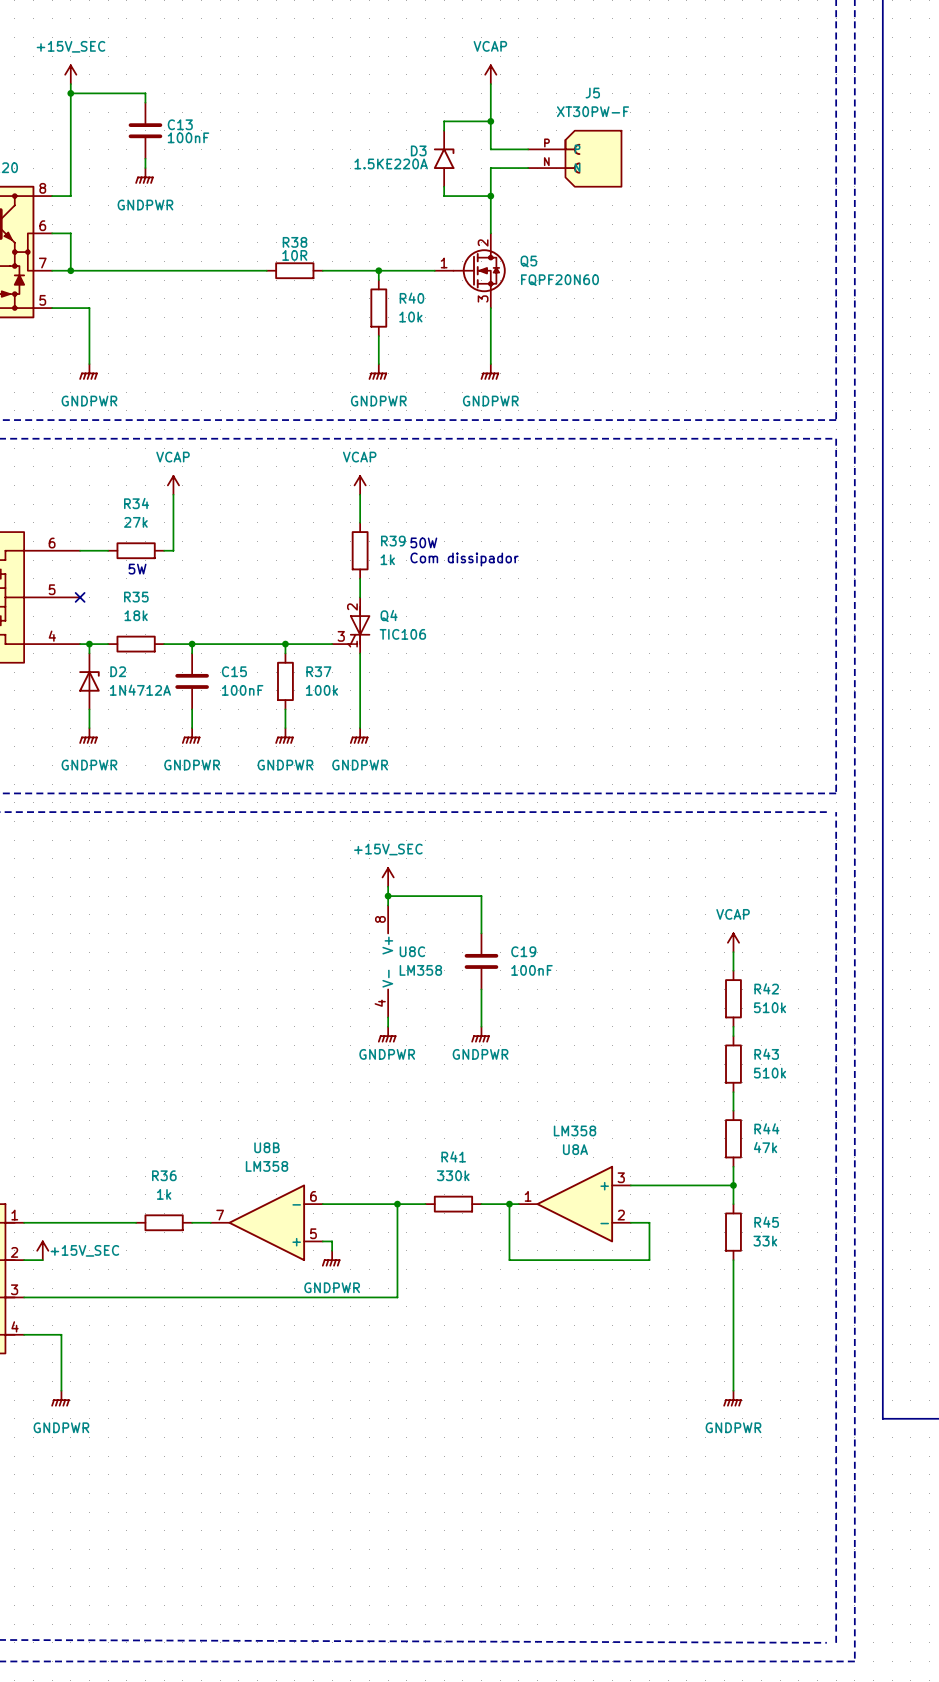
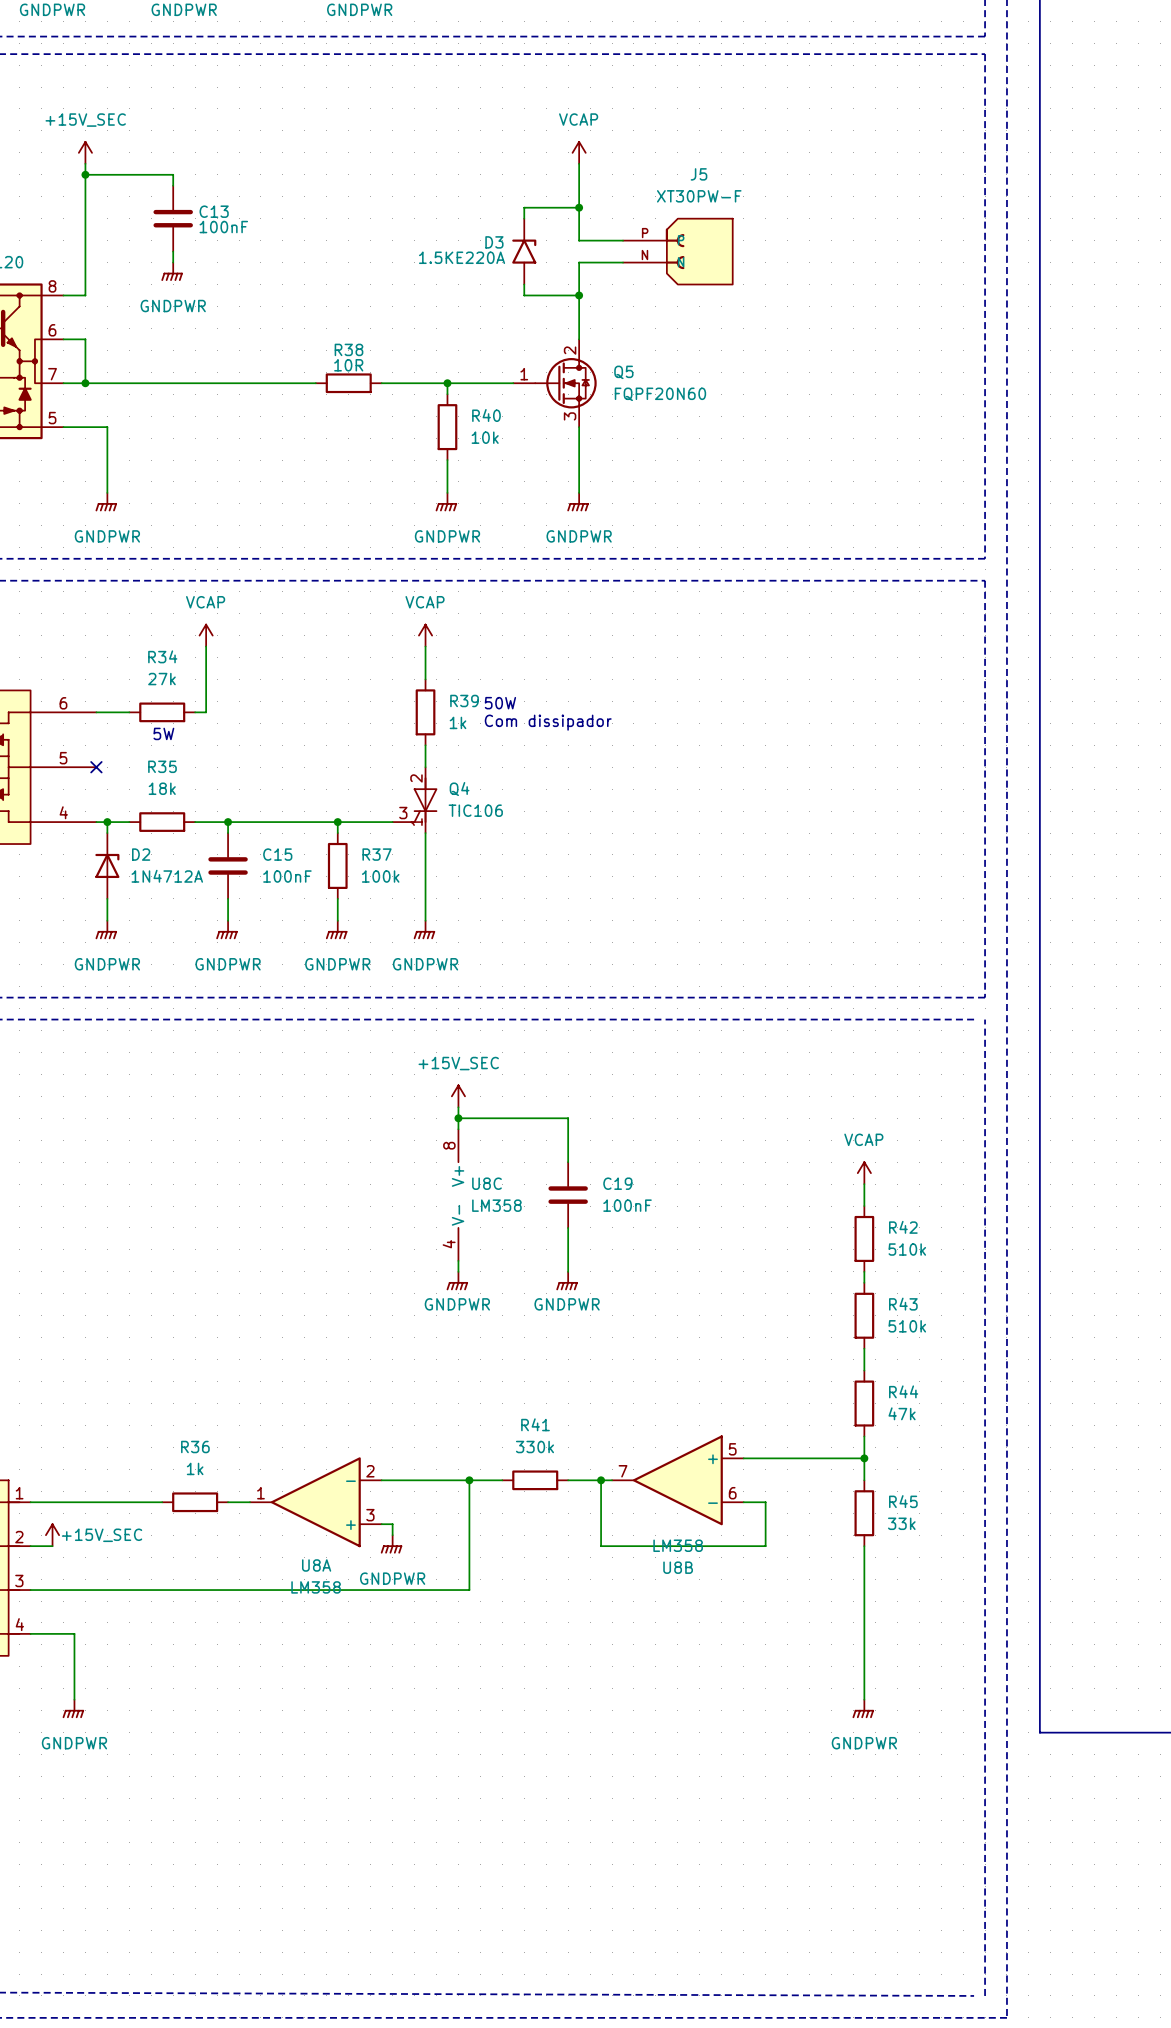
U8A flip: as is (574, 1204) -> up-down (315, 1502)
U8A position: (574, 1204) -> (315, 1502)
U8B flip: as is (266, 1222) -> up-down (677, 1480)
U8B position: (266, 1222) -> (677, 1480)

